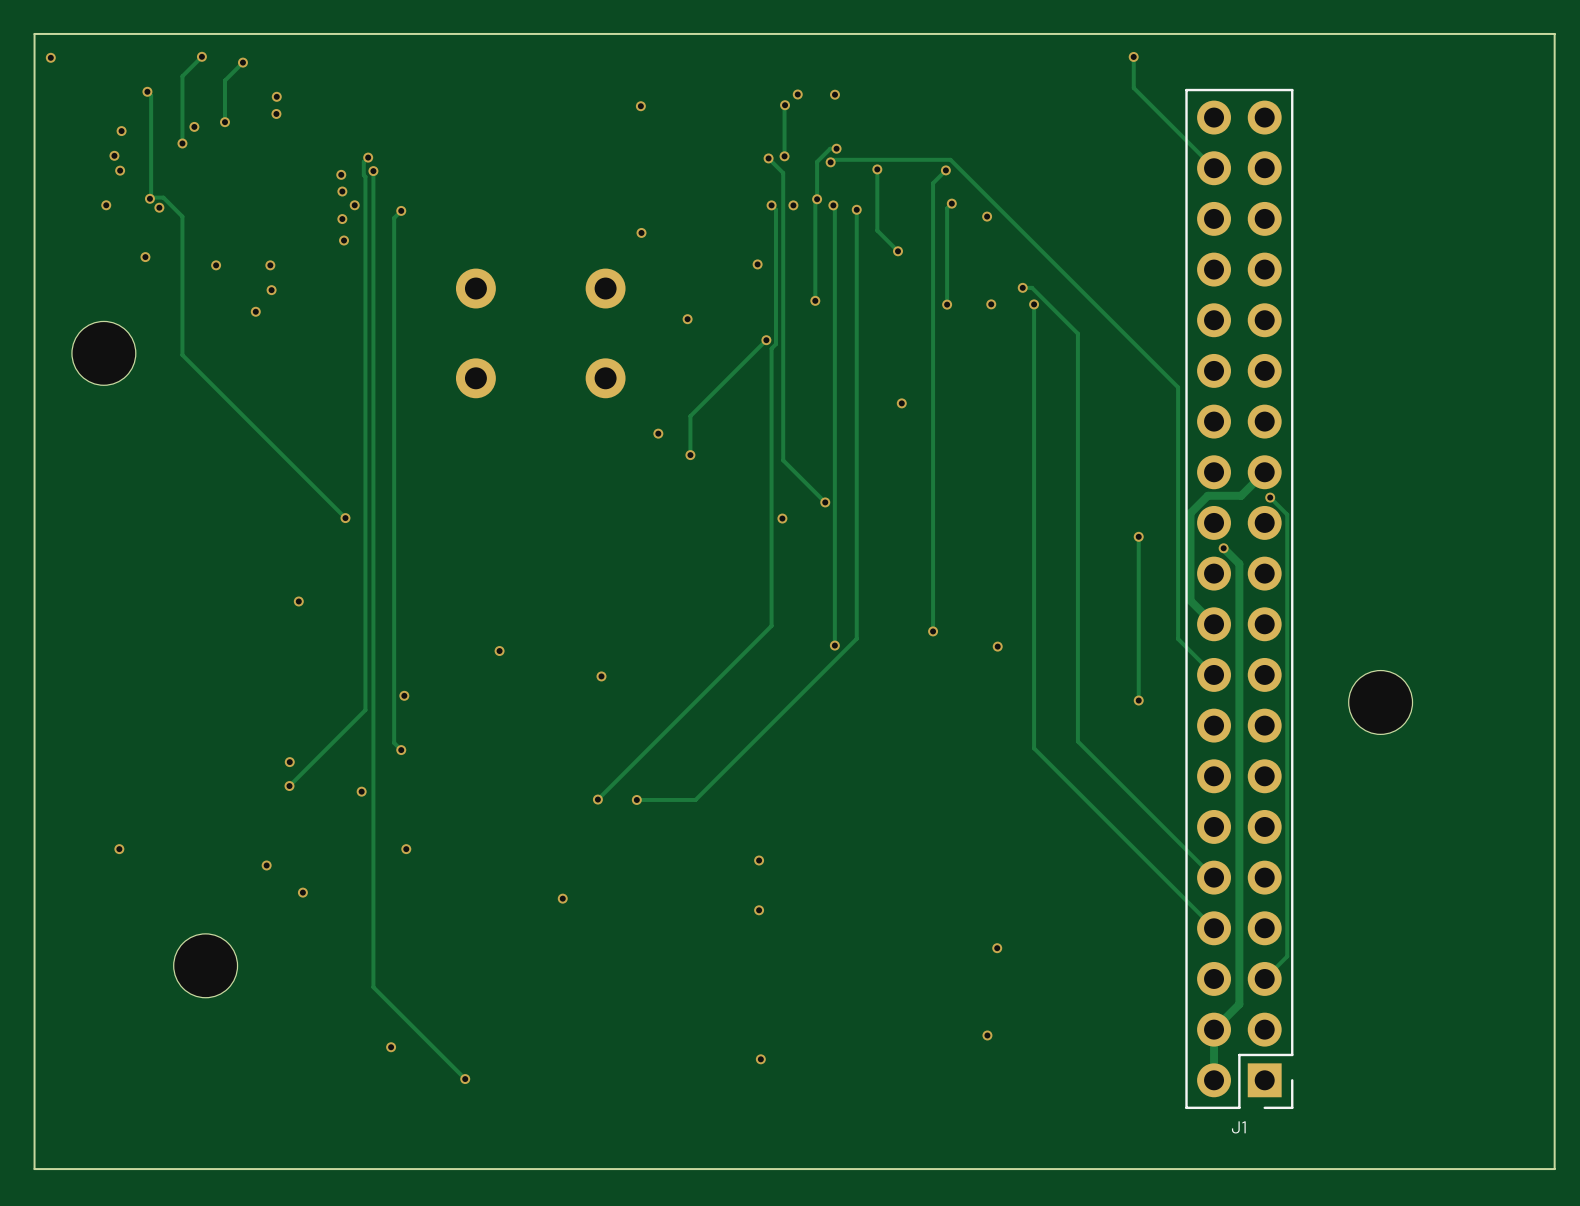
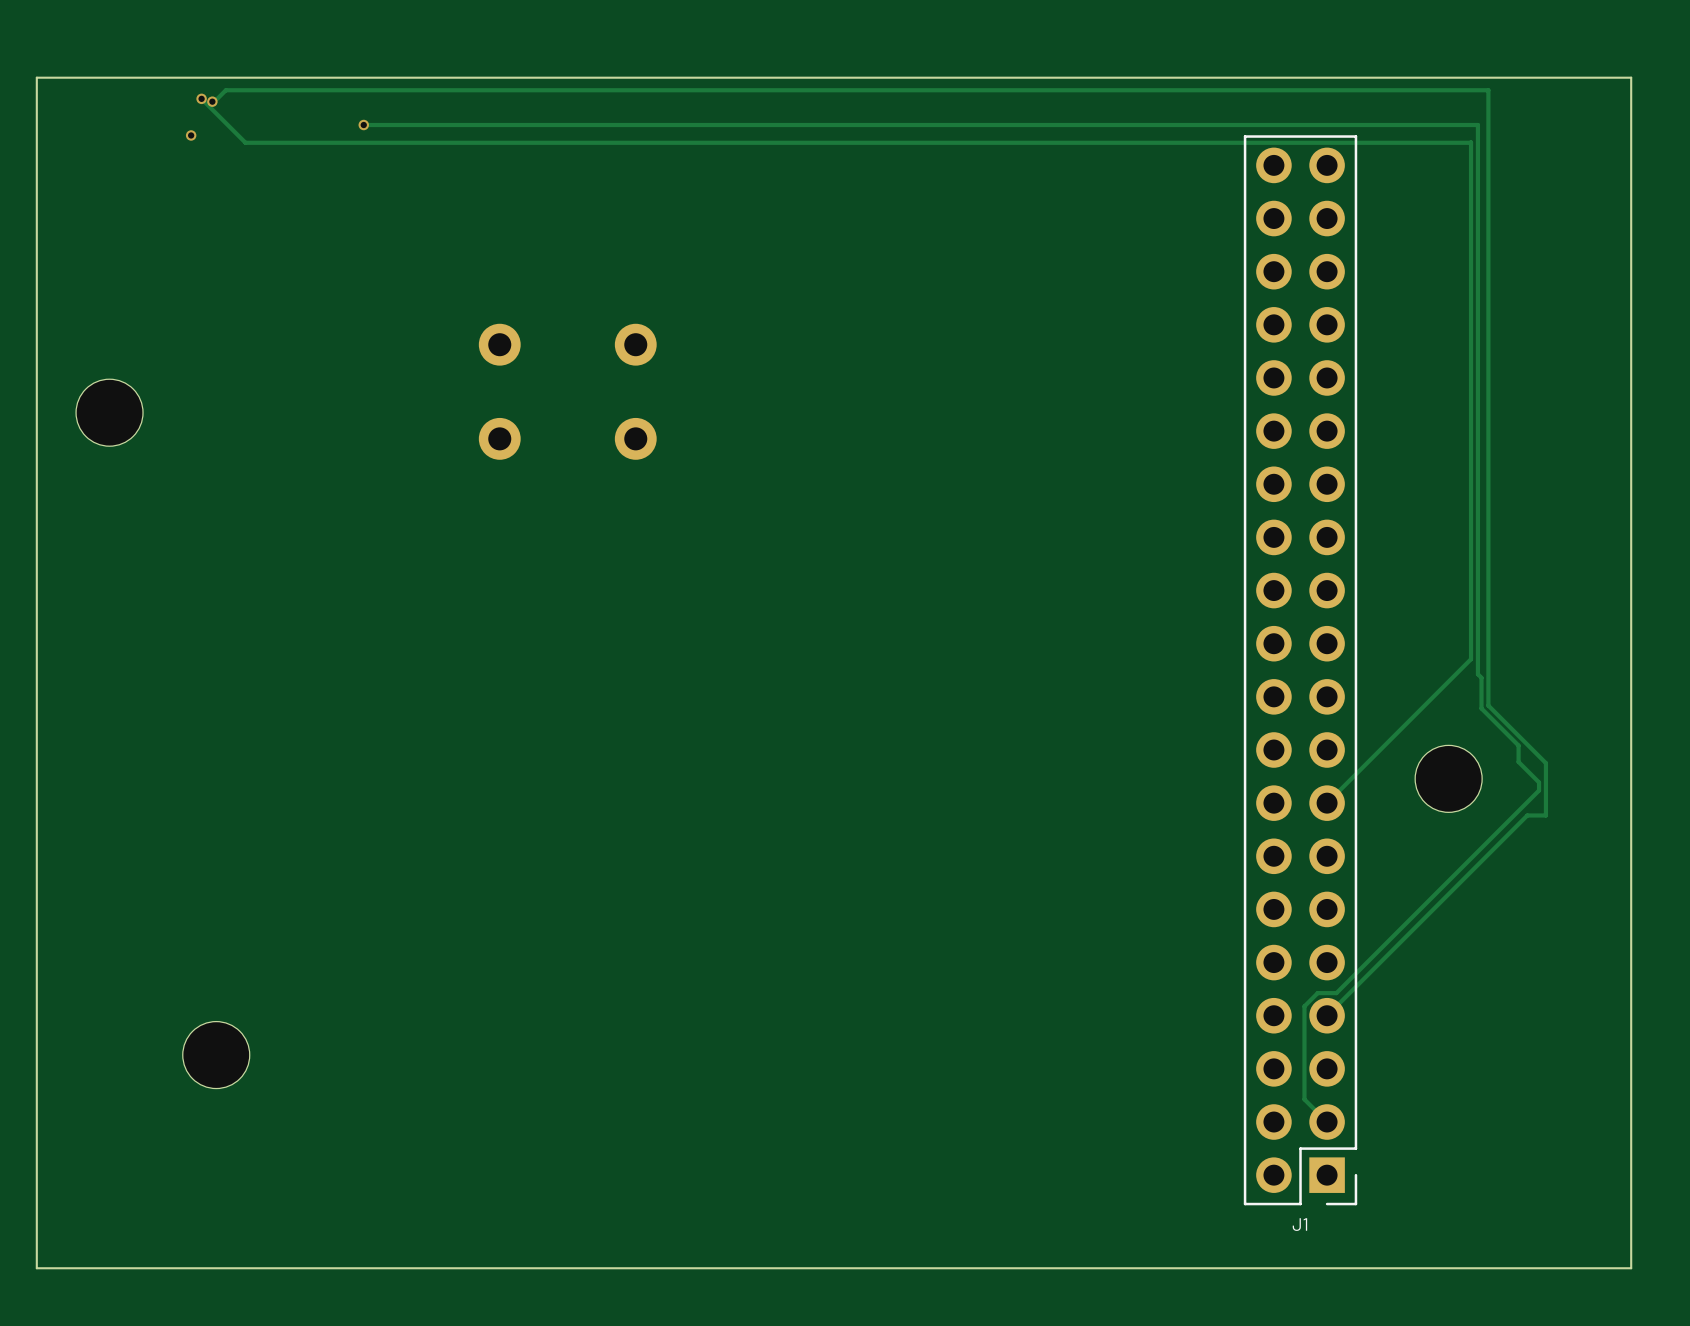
track: none -> (201, 98) (245, 142) (1471, 142) (1471, 659) (1327, 803)
via: none -> (201, 98)
track: none -> (217, 98) (225, 90) (1488, 90) (1488, 705) (1545, 763) (1545, 815) (1527, 815) (1327, 1015)
track: (201, 56) (182, 76) (182, 143) -> none
track: (1133, 56) (1133, 87) (1214, 168) -> none
via: (1133, 56) -> none
via: (50, 57) -> none
track: (242, 62) (224, 80) (224, 122) -> none
via: (242, 62) -> none
track: none -> (363, 125) (1477, 125) (1477, 674) (1481, 677) (1481, 708) (1518, 745) (1518, 761) (1539, 782) (1539, 790) (1336, 993) (1317, 993) (1304, 1006) (1304, 1099) (1327, 1122)
via: none -> (363, 125)
via: none -> (191, 135)
track: (147, 91) (151, 95) (151, 197) -> none
via: (147, 91) -> none
via: (797, 94) -> none
via: (834, 94) -> none
via: (276, 96) -> none
track: (785, 105) (784, 156) -> none
via: (785, 105) -> none
via: (640, 106) -> none
via: (276, 113) -> none
via: (224, 122) -> none
via: (194, 126) -> none
via: (121, 131) -> none
via: (182, 143) -> none
track: (836, 148) (830, 148) (817, 161) (815, 300) -> none
via: (836, 148) -> none
via: (114, 155) -> none
via: (784, 156) -> none
track: (368, 157) (363, 161) (365, 176) (365, 710) (289, 786) -> none
via: (368, 157) -> none
track: (768, 158) (783, 173) (783, 460) (825, 502) -> none
via: (768, 158) -> none
track: (830, 162) (833, 159) (950, 159) (1178, 387) (1178, 639) (1214, 674) -> none
via: (830, 162) -> none
track: (877, 169) (877, 230) (898, 251) -> none
via: (877, 169) -> none
via: (120, 170) -> none
track: (945, 170) (933, 183) (933, 631) -> none
via: (945, 170) -> none
track: (373, 171) (373, 987) (465, 1079) -> none
via: (373, 171) -> none
via: (341, 174) -> none
via: (342, 191) -> none
track: (151, 197) (163, 197) (182, 216) (182, 355) (345, 518) -> none
via: (149, 198) -> none
via: (817, 199) -> none
track: (951, 203) (947, 208) (947, 304) -> none
via: (951, 203) -> none
via: (106, 205) -> none
via: (354, 205) -> none
track: (771, 205) (775, 209) (775, 344) (771, 348) (771, 625) (597, 799) -> none
via: (771, 205) -> none
via: (793, 205) -> none
track: (833, 205) (834, 206) (834, 645) -> none
via: (833, 205) -> none
via: (159, 207) -> none
track: (856, 209) (856, 638) (695, 799) (636, 799) -> none
via: (856, 209) -> none
track: (401, 210) (394, 217) (394, 742) (401, 750) -> none
via: (401, 210) -> none
via: (987, 216) -> none
via: (342, 219) -> none
via: (641, 232) -> none
via: (344, 240) -> none
via: (898, 251) -> none
via: (145, 257) -> none
via: (757, 264) -> none
via: (216, 265) -> none
via: (270, 265) -> none
track: (1022, 287) (1032, 287) (1077, 333) (1077, 741) (1214, 877) -> none
via: (1022, 287) -> none
via: (271, 290) -> none
via: (815, 300) -> none
via: (947, 304) -> none
via: (991, 304) -> none
track: (1034, 304) (1034, 748) (1214, 928) -> none
via: (1034, 304) -> none
via: (255, 311) -> none
via: (687, 319) -> none
track: (766, 340) (690, 416) (690, 455) -> none
via: (766, 340) -> none
via: (901, 403) -> none
via: (658, 433) -> none
via: (690, 455) -> none
track: (1264, 472) (1241, 495) (1207, 495) (1190, 513) (1190, 600) (1214, 624) -> none
track: (1270, 497) (1287, 514) (1287, 956) (1264, 978) -> none
via: (1270, 497) -> none
via: (825, 502) -> none
via: (345, 518) -> none
via: (782, 518) -> none
track: (1138, 536) (1138, 700) -> none
via: (1138, 536) -> none
track: (1223, 548) (1239, 563) (1239, 1004) (1214, 1029) (1214, 1080) -> none
via: (1223, 548) -> none
via: (298, 601) -> none
via: (933, 631) -> none
via: (834, 645) -> none
via: (997, 646) -> none
via: (499, 651) -> none
via: (601, 676) -> none
via: (404, 695) -> none
via: (1138, 700) -> none
via: (401, 750) -> none
via: (289, 762) -> none
via: (289, 786) -> none
via: (361, 791) -> none
via: (597, 799) -> none
via: (636, 799) -> none
via: (119, 849) -> none
via: (406, 849) -> none
via: (759, 860) -> none
via: (266, 865) -> none
via: (302, 892) -> none
via: (562, 898) -> none
via: (759, 910) -> none
via: (997, 948) -> none
via: (987, 1035) -> none
via: (391, 1047) -> none
via: (760, 1059) -> none
via: (465, 1079) -> none

